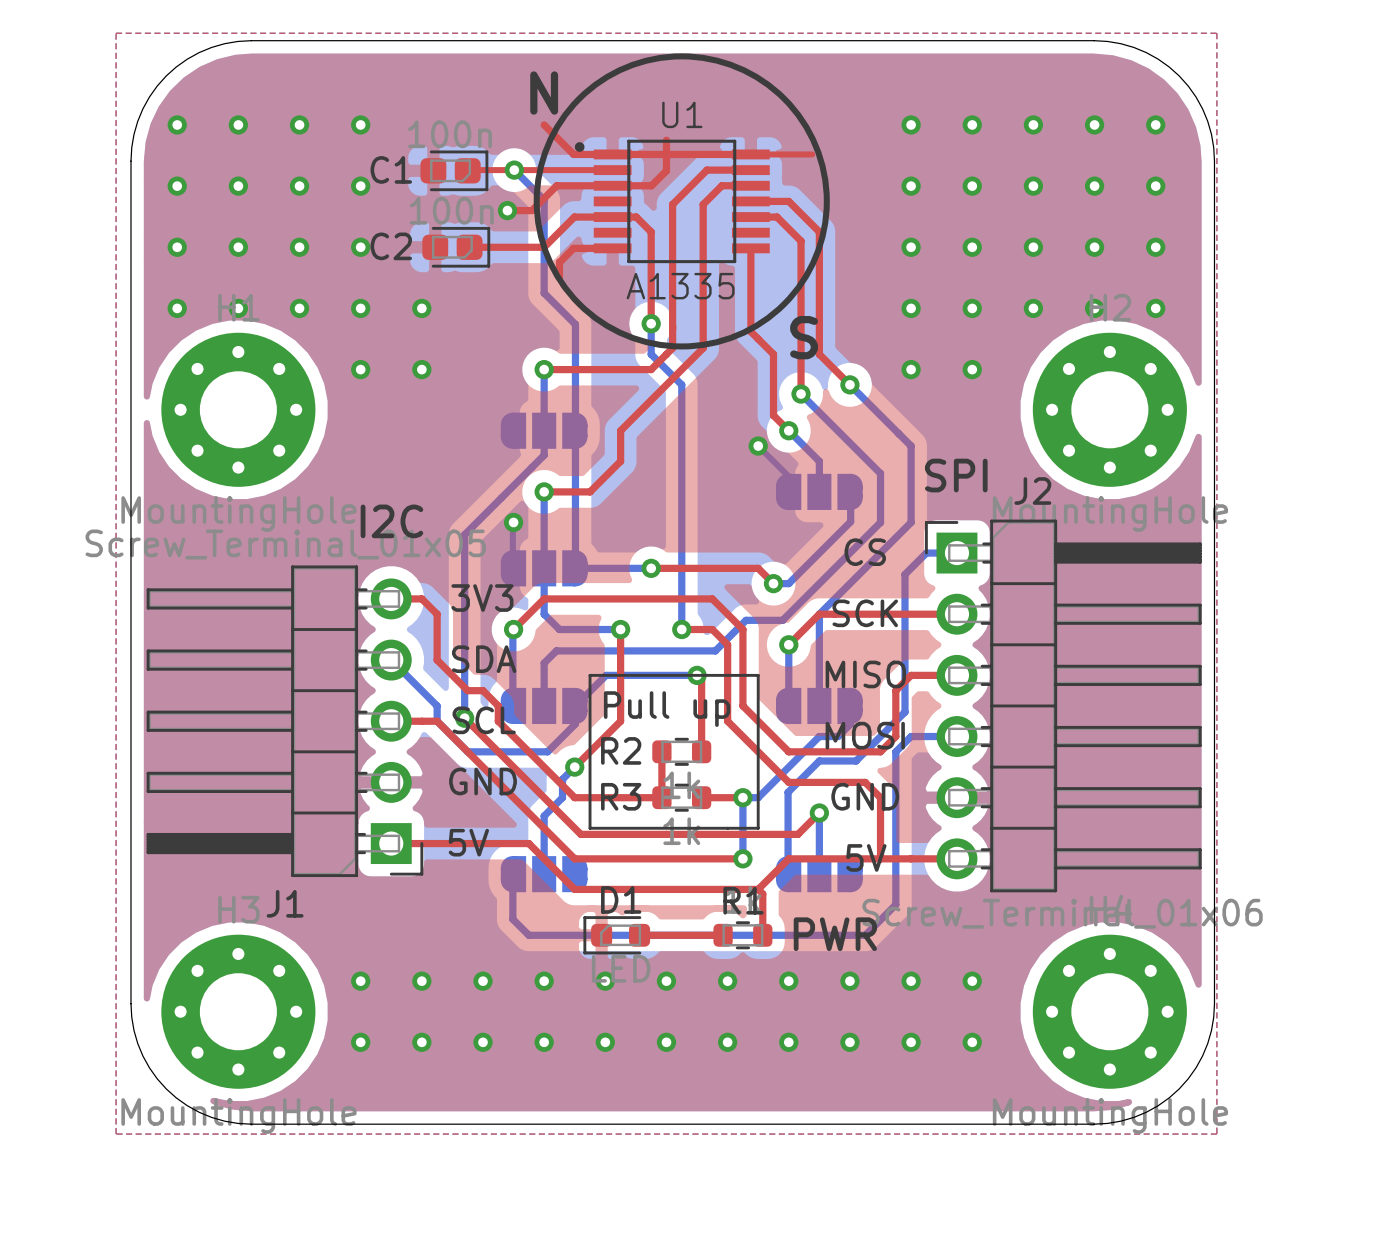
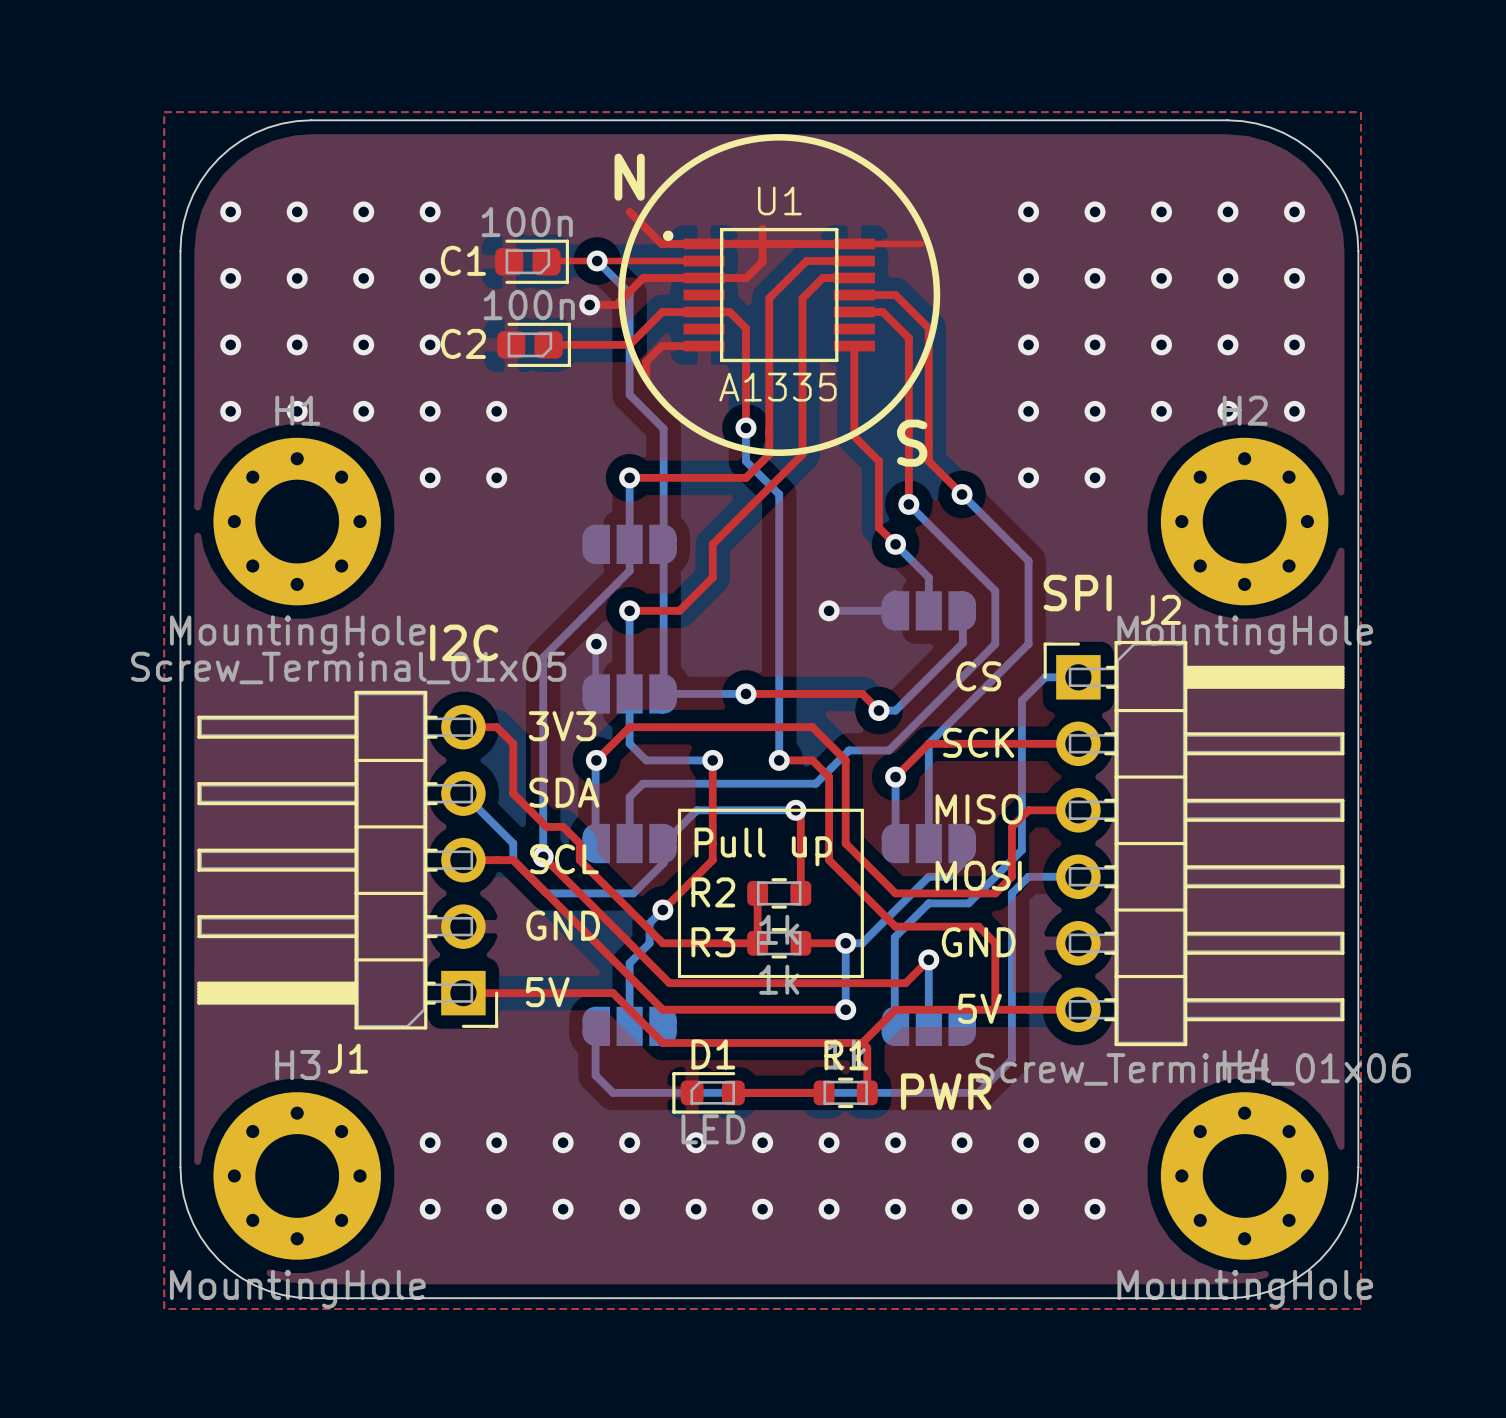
bottom track: (758, 446) (788, 475) -> none
via position: (758, 446) -> (829, 610)
bottom track: none -> (829, 610) (894, 610)

